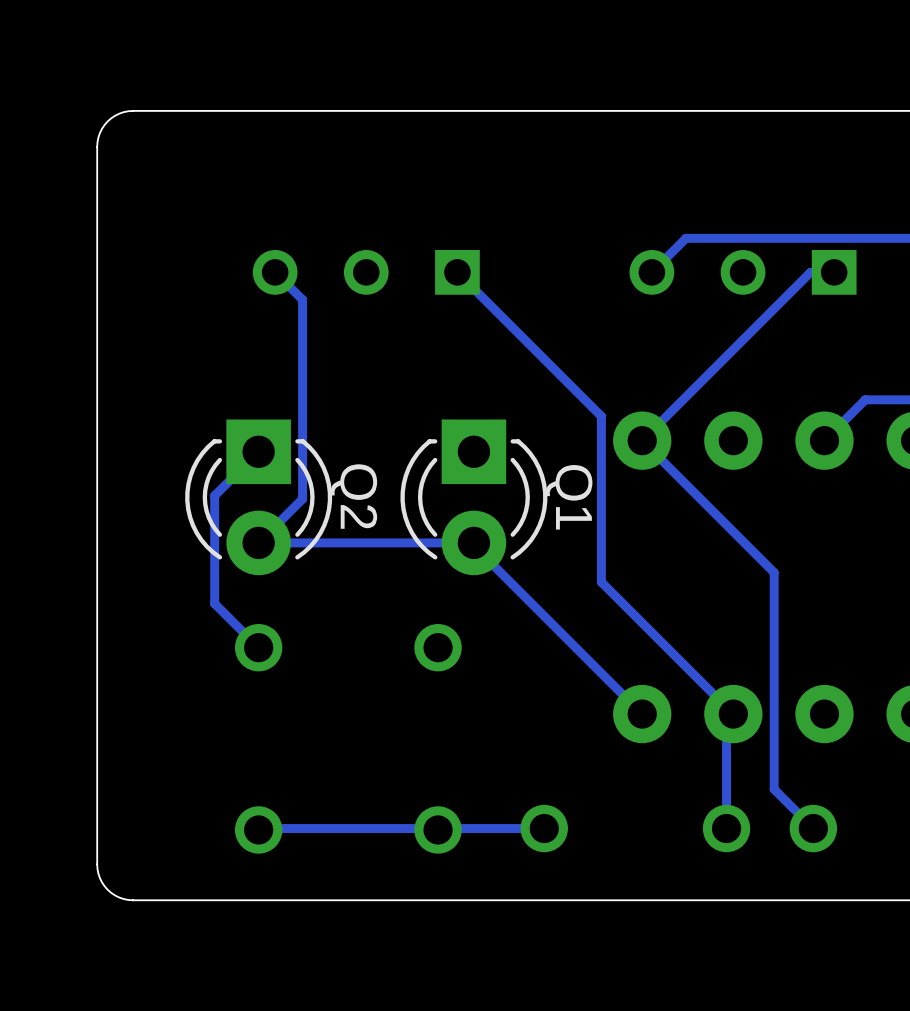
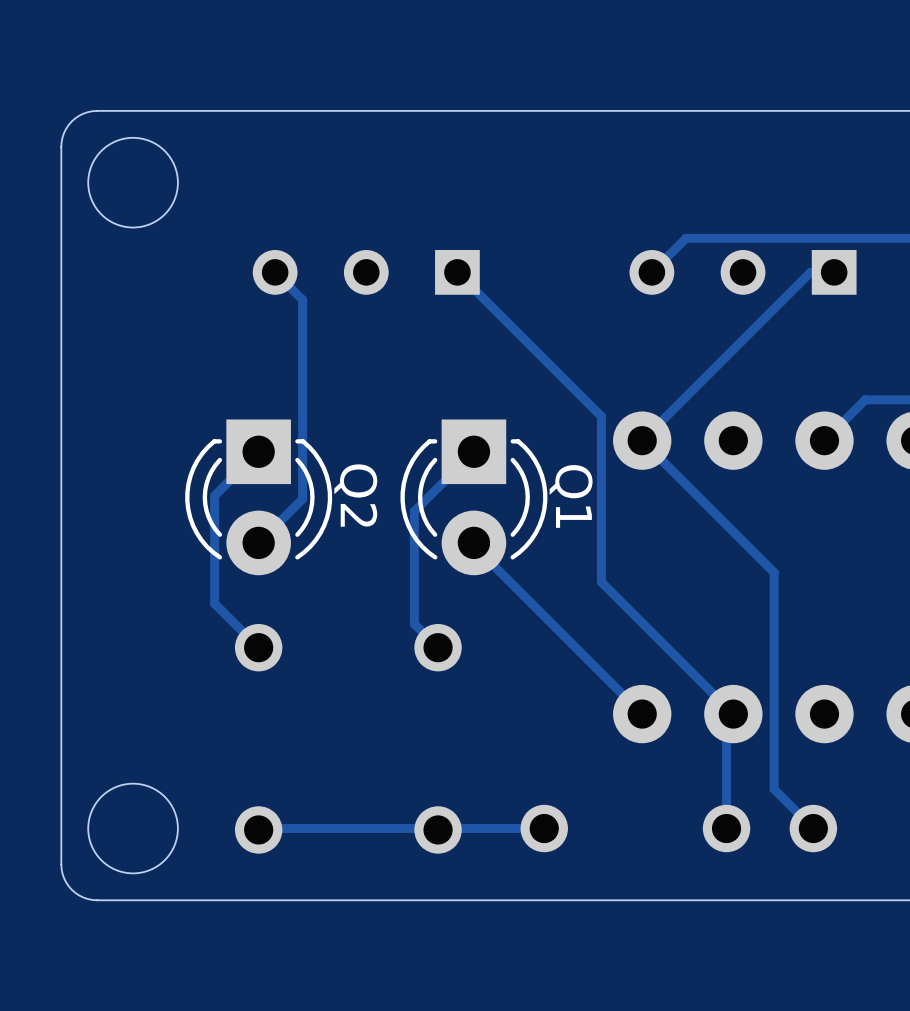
board edge: (133, 110) (119, 113) (107, 121) (99, 133) (97, 146) (97, 864) (99, 878) (107, 889) (119, 897) (133, 900) -> (133, 110) (92, 111) (79, 115) (66, 128) (61, 146) (61, 869) (68, 886) (83, 897) (97, 900) (133, 900)
round board edge: none -> [87, 136, 179, 229]
track: none -> (473, 451) (414, 511) (414, 623) (438, 647)
track: (473, 542) (258, 542) -> none
round board edge: none -> [87, 782, 179, 875]

